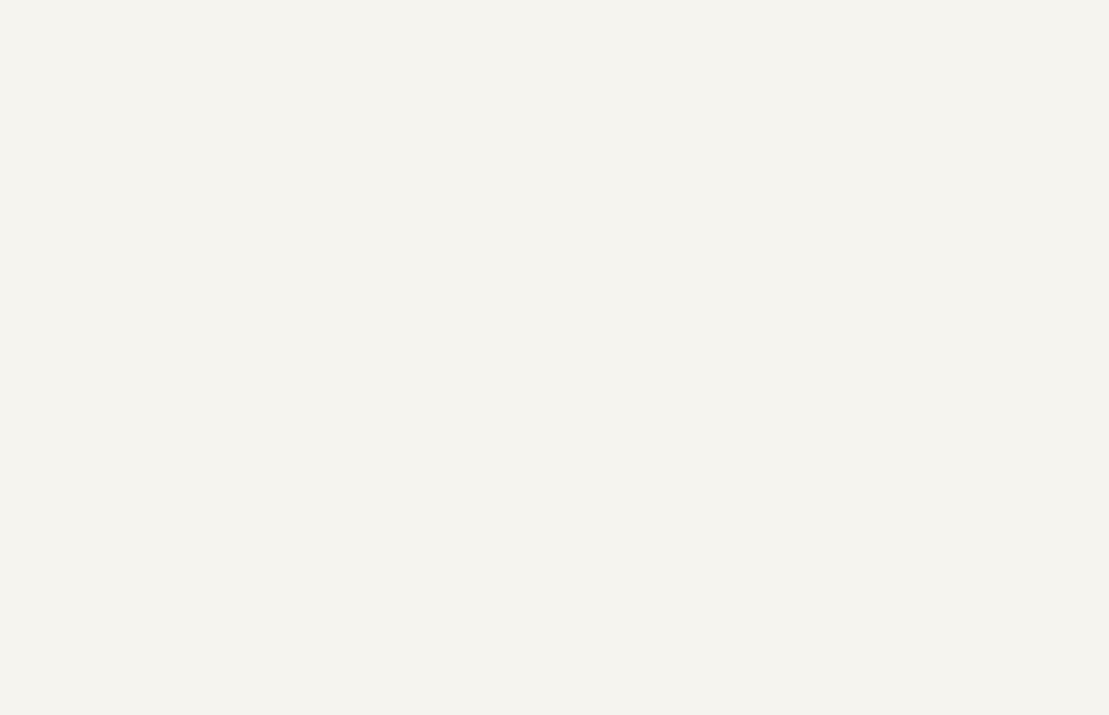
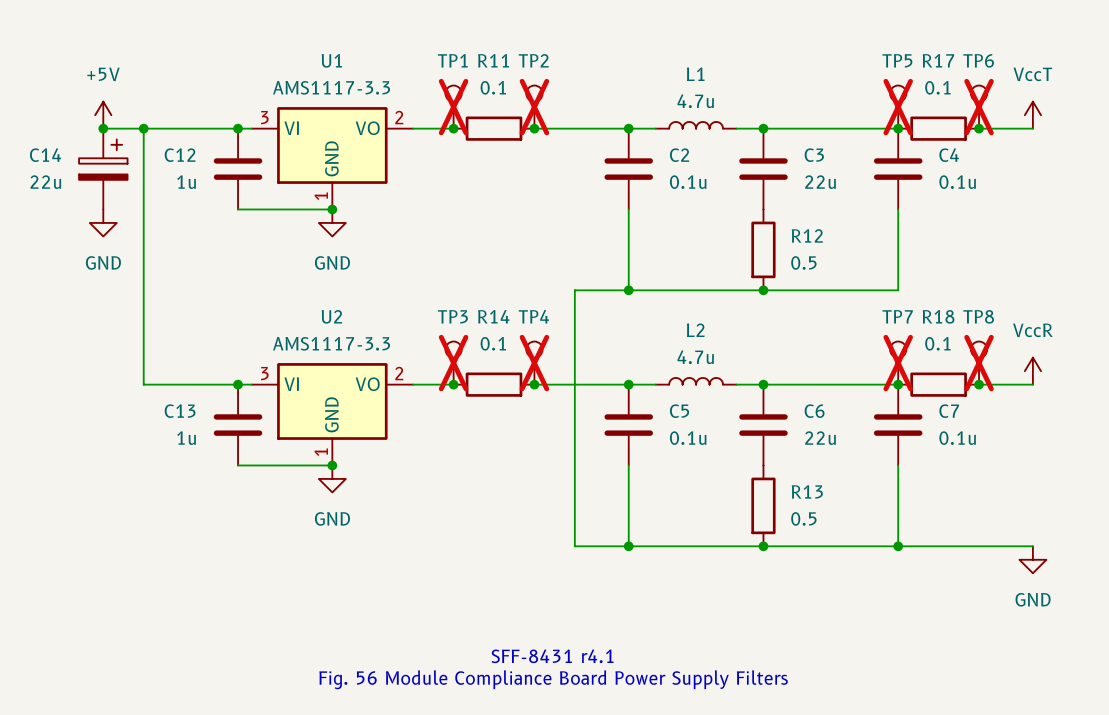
TP1: none -> (453, 107)
TP2: none -> (534, 107)
TP5: none -> (898, 107)
TP6: none -> (979, 107)
power symbol: none -> +5V (103, 115)
power symbol: none -> VccT (1032, 115)
L1: none -> 4.7u (696, 125)
wire: none -> (103, 128) (251, 128)
junction: none -> (103, 128)
wire: none -> (143, 128) (143, 384) (251, 384)
junction: none -> (143, 128)
junction: none -> (238, 128)
wire: none -> (413, 128) (453, 128)
junction: none -> (453, 128)
R11: none -> 0.1 (494, 128)
wire: none -> (534, 128) (655, 128)
junction: none -> (534, 128)
junction: none -> (628, 128)
wire: none -> (736, 128) (898, 128)
junction: none -> (763, 128)
junction: none -> (898, 128)
R17: none -> 0.1 (938, 128)
wire: none -> (979, 128) (1032, 128)
junction: none -> (979, 128)
U1: none -> AMS1117-3.3 (332, 158)
C14: none -> 22u (103, 169)
C12: none -> 1u (238, 169)
C2: none -> 0.1u (628, 169)
C3: none -> 22u (763, 169)
C4: none -> 0.1u (898, 169)
wire: none -> (238, 209) (332, 209)
junction: none -> (332, 209)
wire: none -> (628, 209) (628, 290)
wire: none -> (898, 209) (898, 290) (574, 290) (574, 546) (1032, 546)
power symbol: none -> GND (103, 222)
power symbol: none -> GND (332, 222)
R12: none -> 0.5 (763, 249)
junction: none -> (628, 290)
junction: none -> (763, 290)
TP3: none -> (453, 363)
TP4: none -> (534, 363)
TP7: none -> (898, 363)
TP8: none -> (979, 363)
power symbol: none -> VccR (1032, 371)
L2: none -> 4.7u (696, 381)
junction: none -> (238, 384)
wire: none -> (413, 384) (453, 384)
junction: none -> (453, 384)
R14: none -> 0.1 (494, 384)
wire: none -> (534, 384) (655, 384)
junction: none -> (534, 384)
junction: none -> (628, 384)
wire: none -> (736, 384) (898, 384)
junction: none -> (763, 384)
junction: none -> (898, 384)
R18: none -> 0.1 (938, 384)
wire: none -> (979, 384) (1032, 384)
junction: none -> (979, 384)
U2: none -> AMS1117-3.3 (332, 414)
C13: none -> 1u (238, 425)
C5: none -> 0.1u (628, 425)
C6: none -> 22u (763, 425)
C7: none -> 0.1u (898, 425)
wire: none -> (238, 465) (332, 465)
junction: none -> (332, 465)
wire: none -> (628, 465) (628, 546)
wire: none -> (898, 465) (898, 546)
power symbol: none -> GND (332, 478)
R13: none -> 0.5 (763, 505)
junction: none -> (628, 546)
junction: none -> (763, 546)
junction: none -> (898, 546)
power symbol: none -> GND (1032, 559)
text: none -> SFF-8431 r4.1 (552, 656)
text: none -> Fig. 56 Module Compliance Board Power Supply Filters (553, 679)

